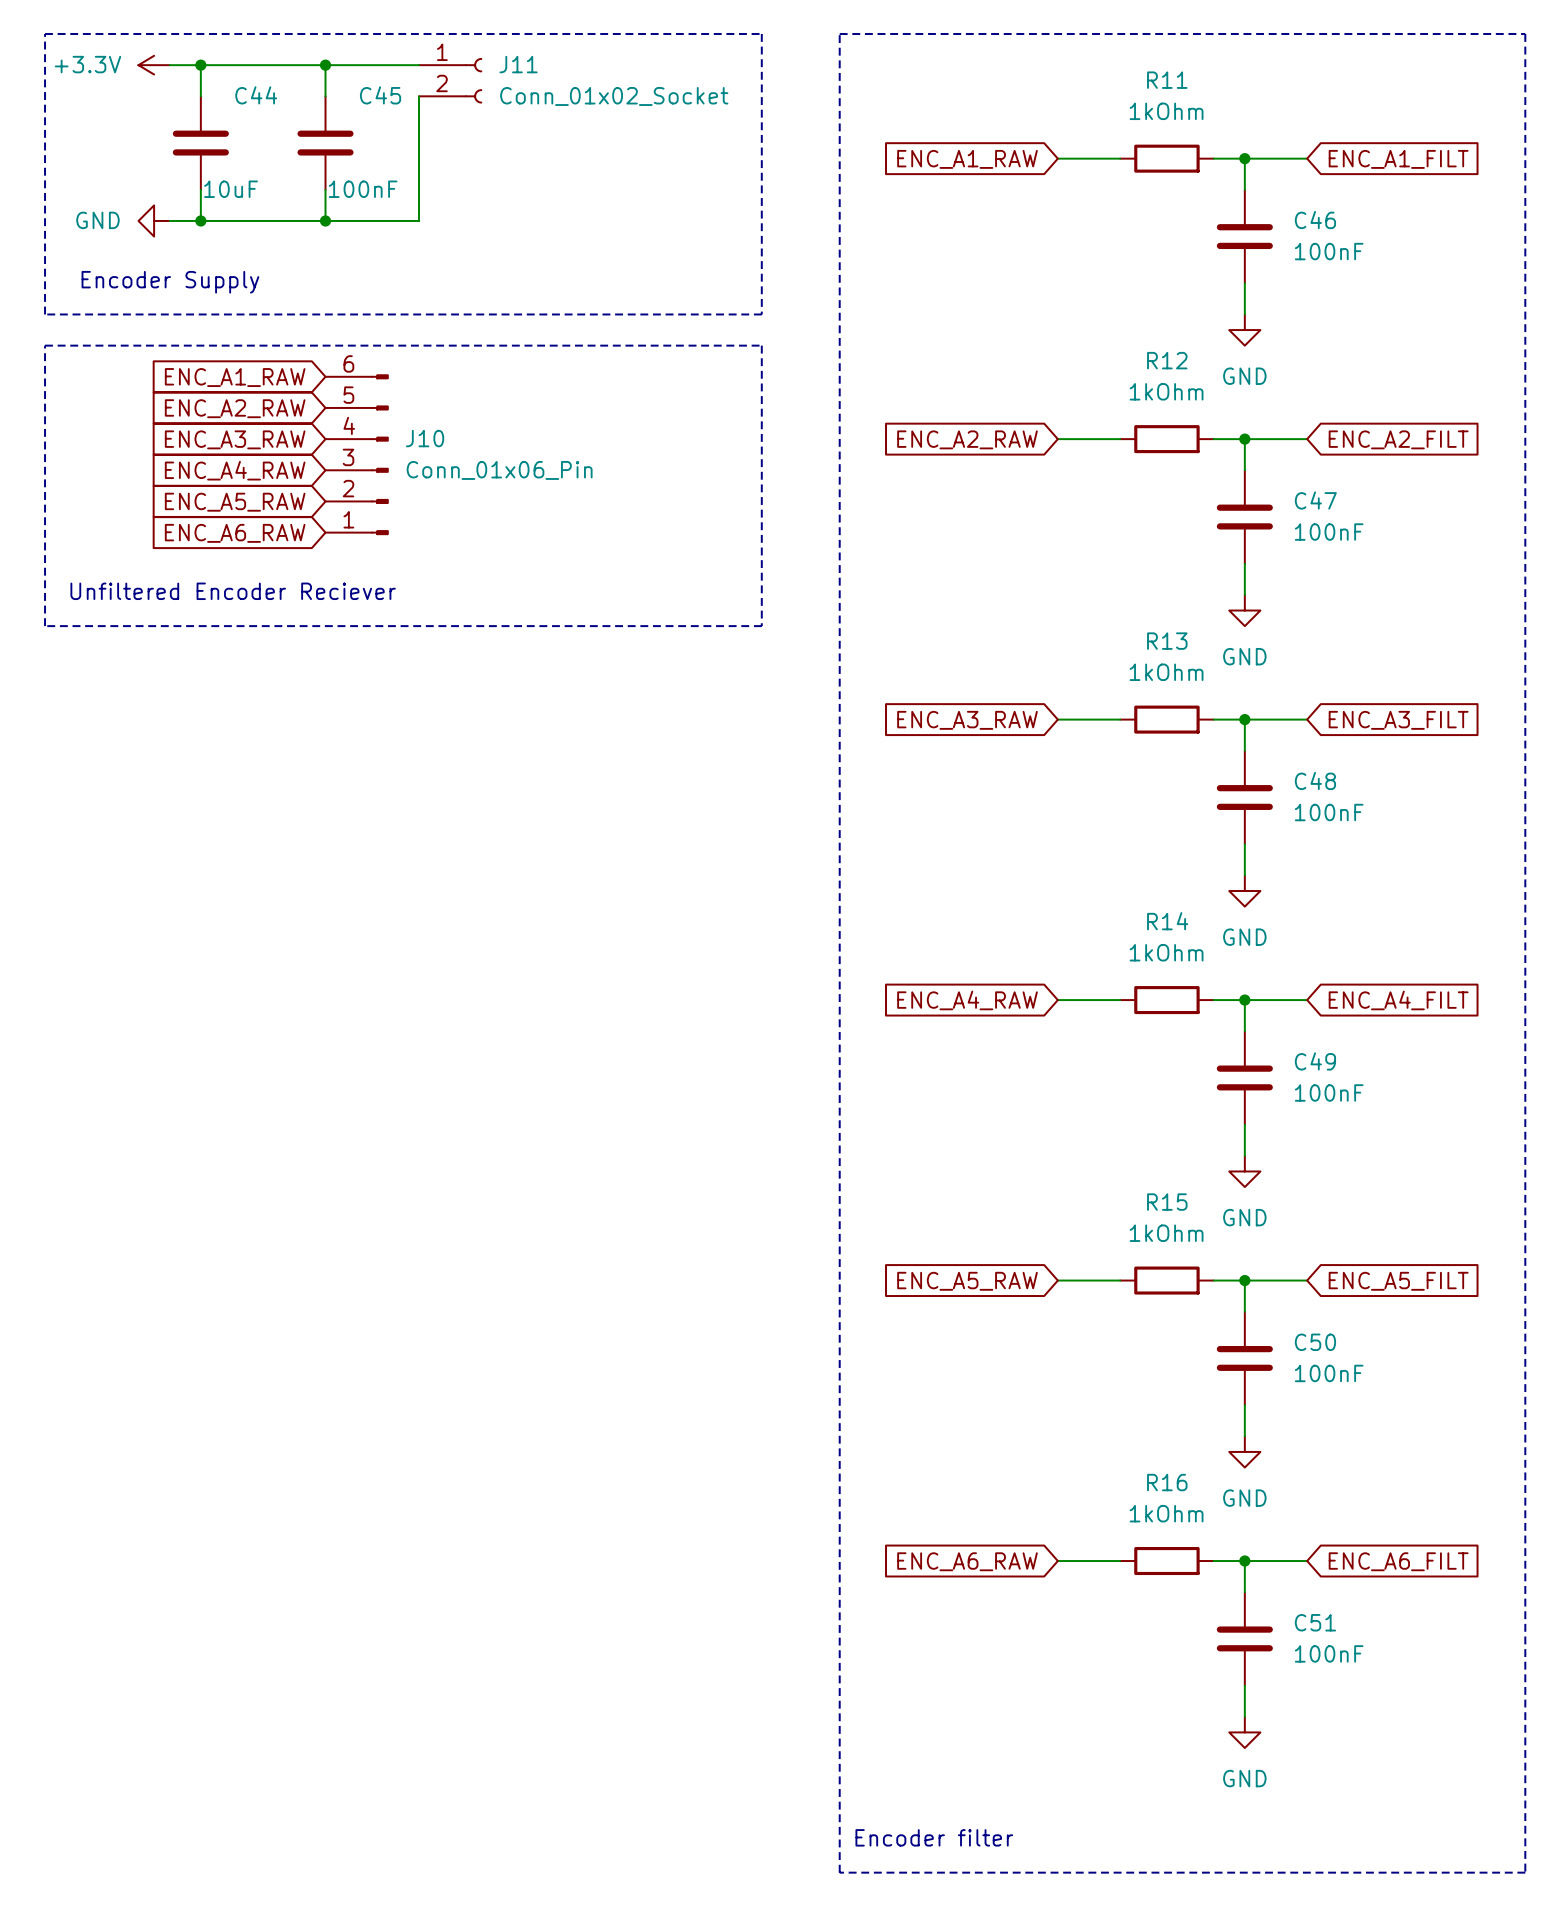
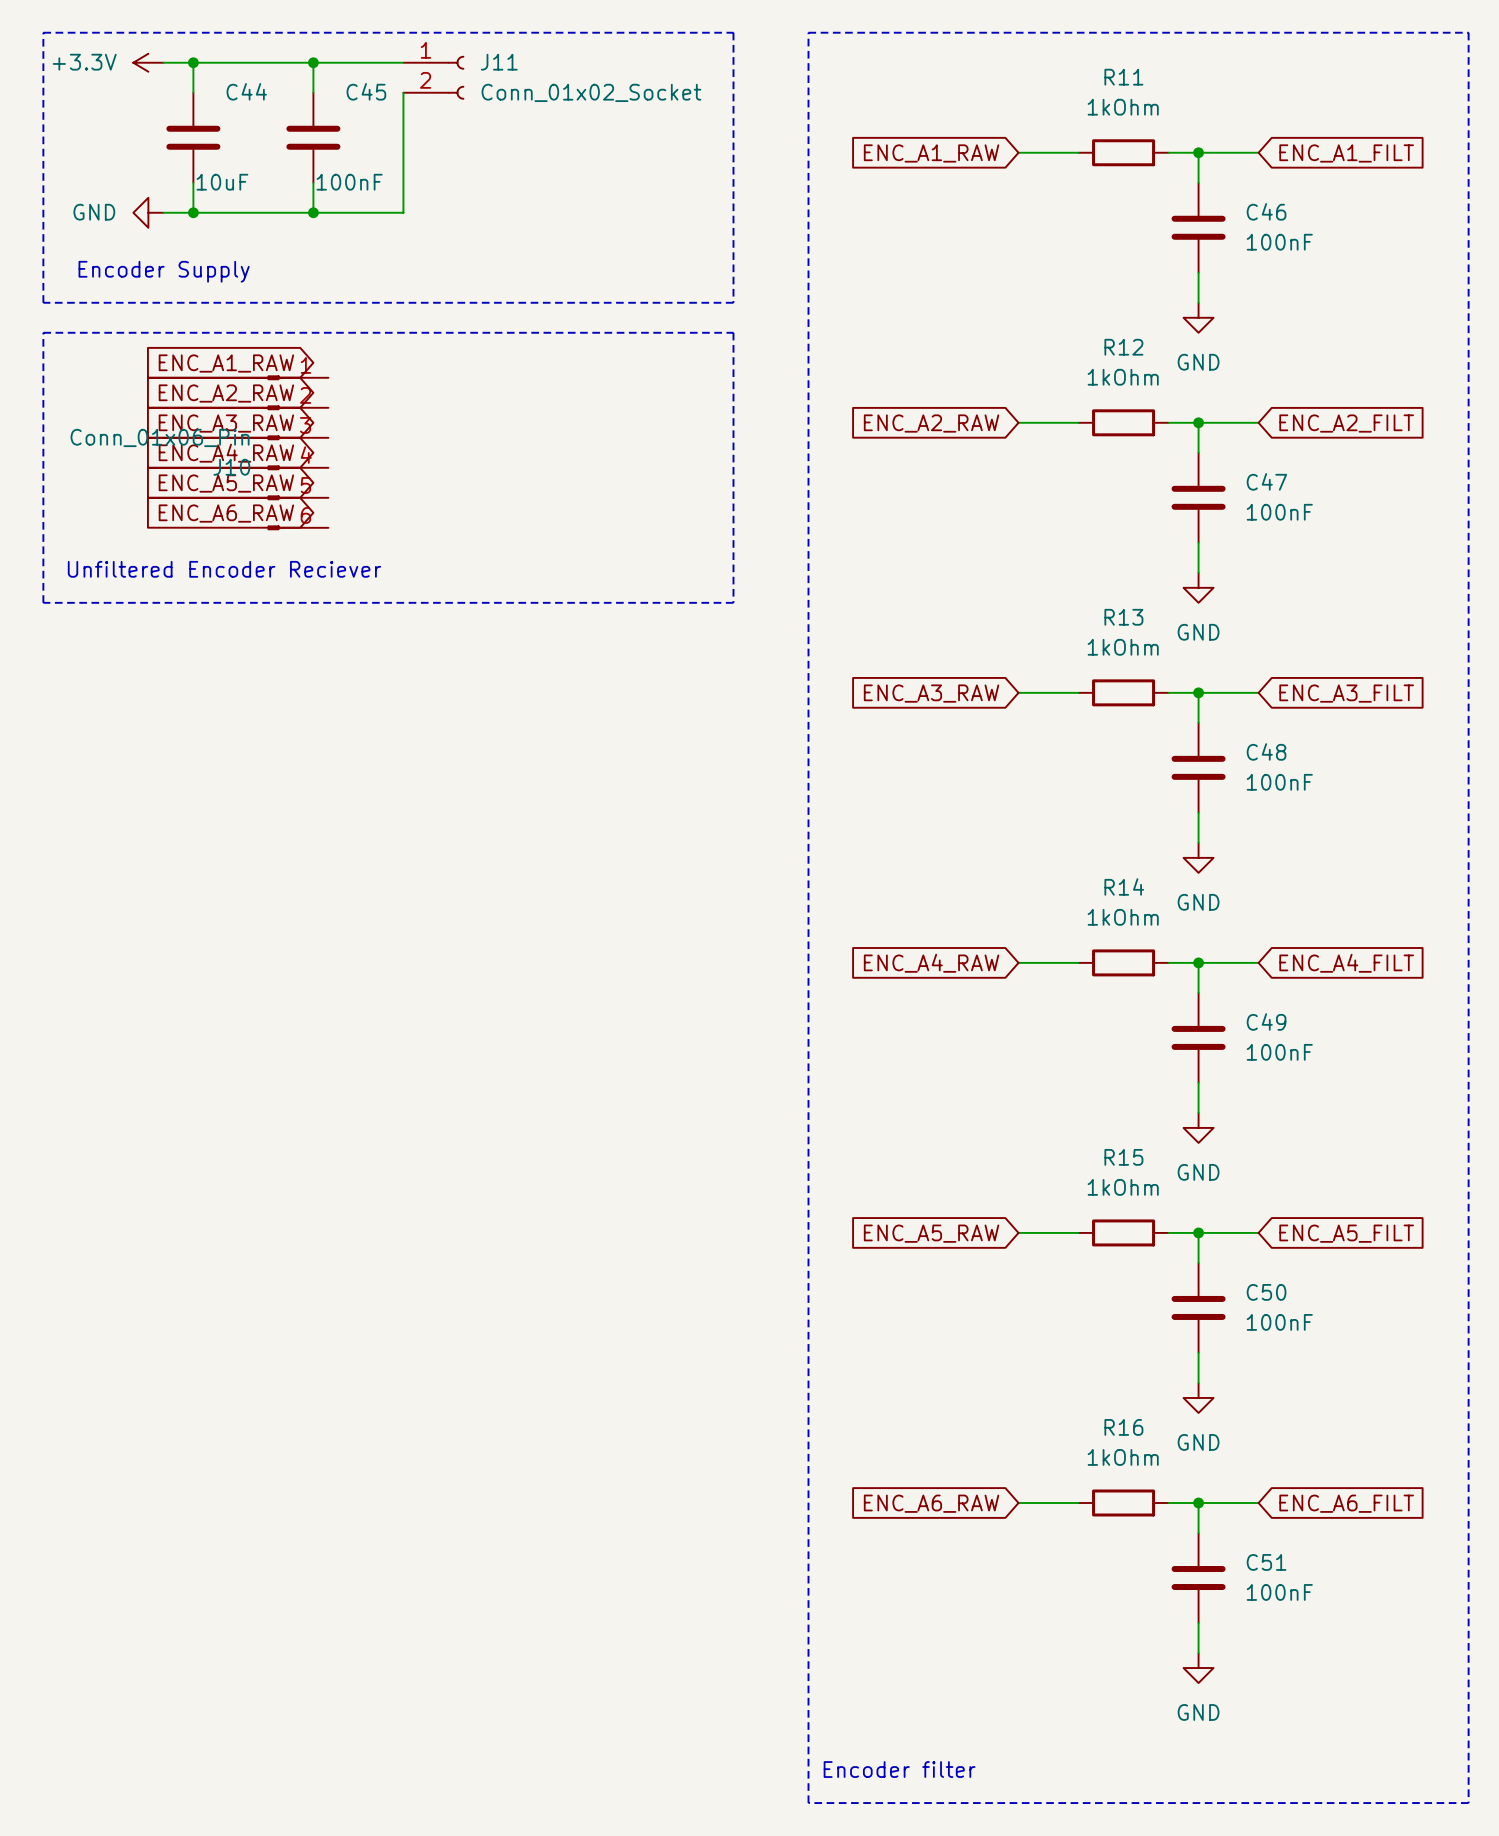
J10 rotation: 0° (380, 454) -> 180° (275, 452)

